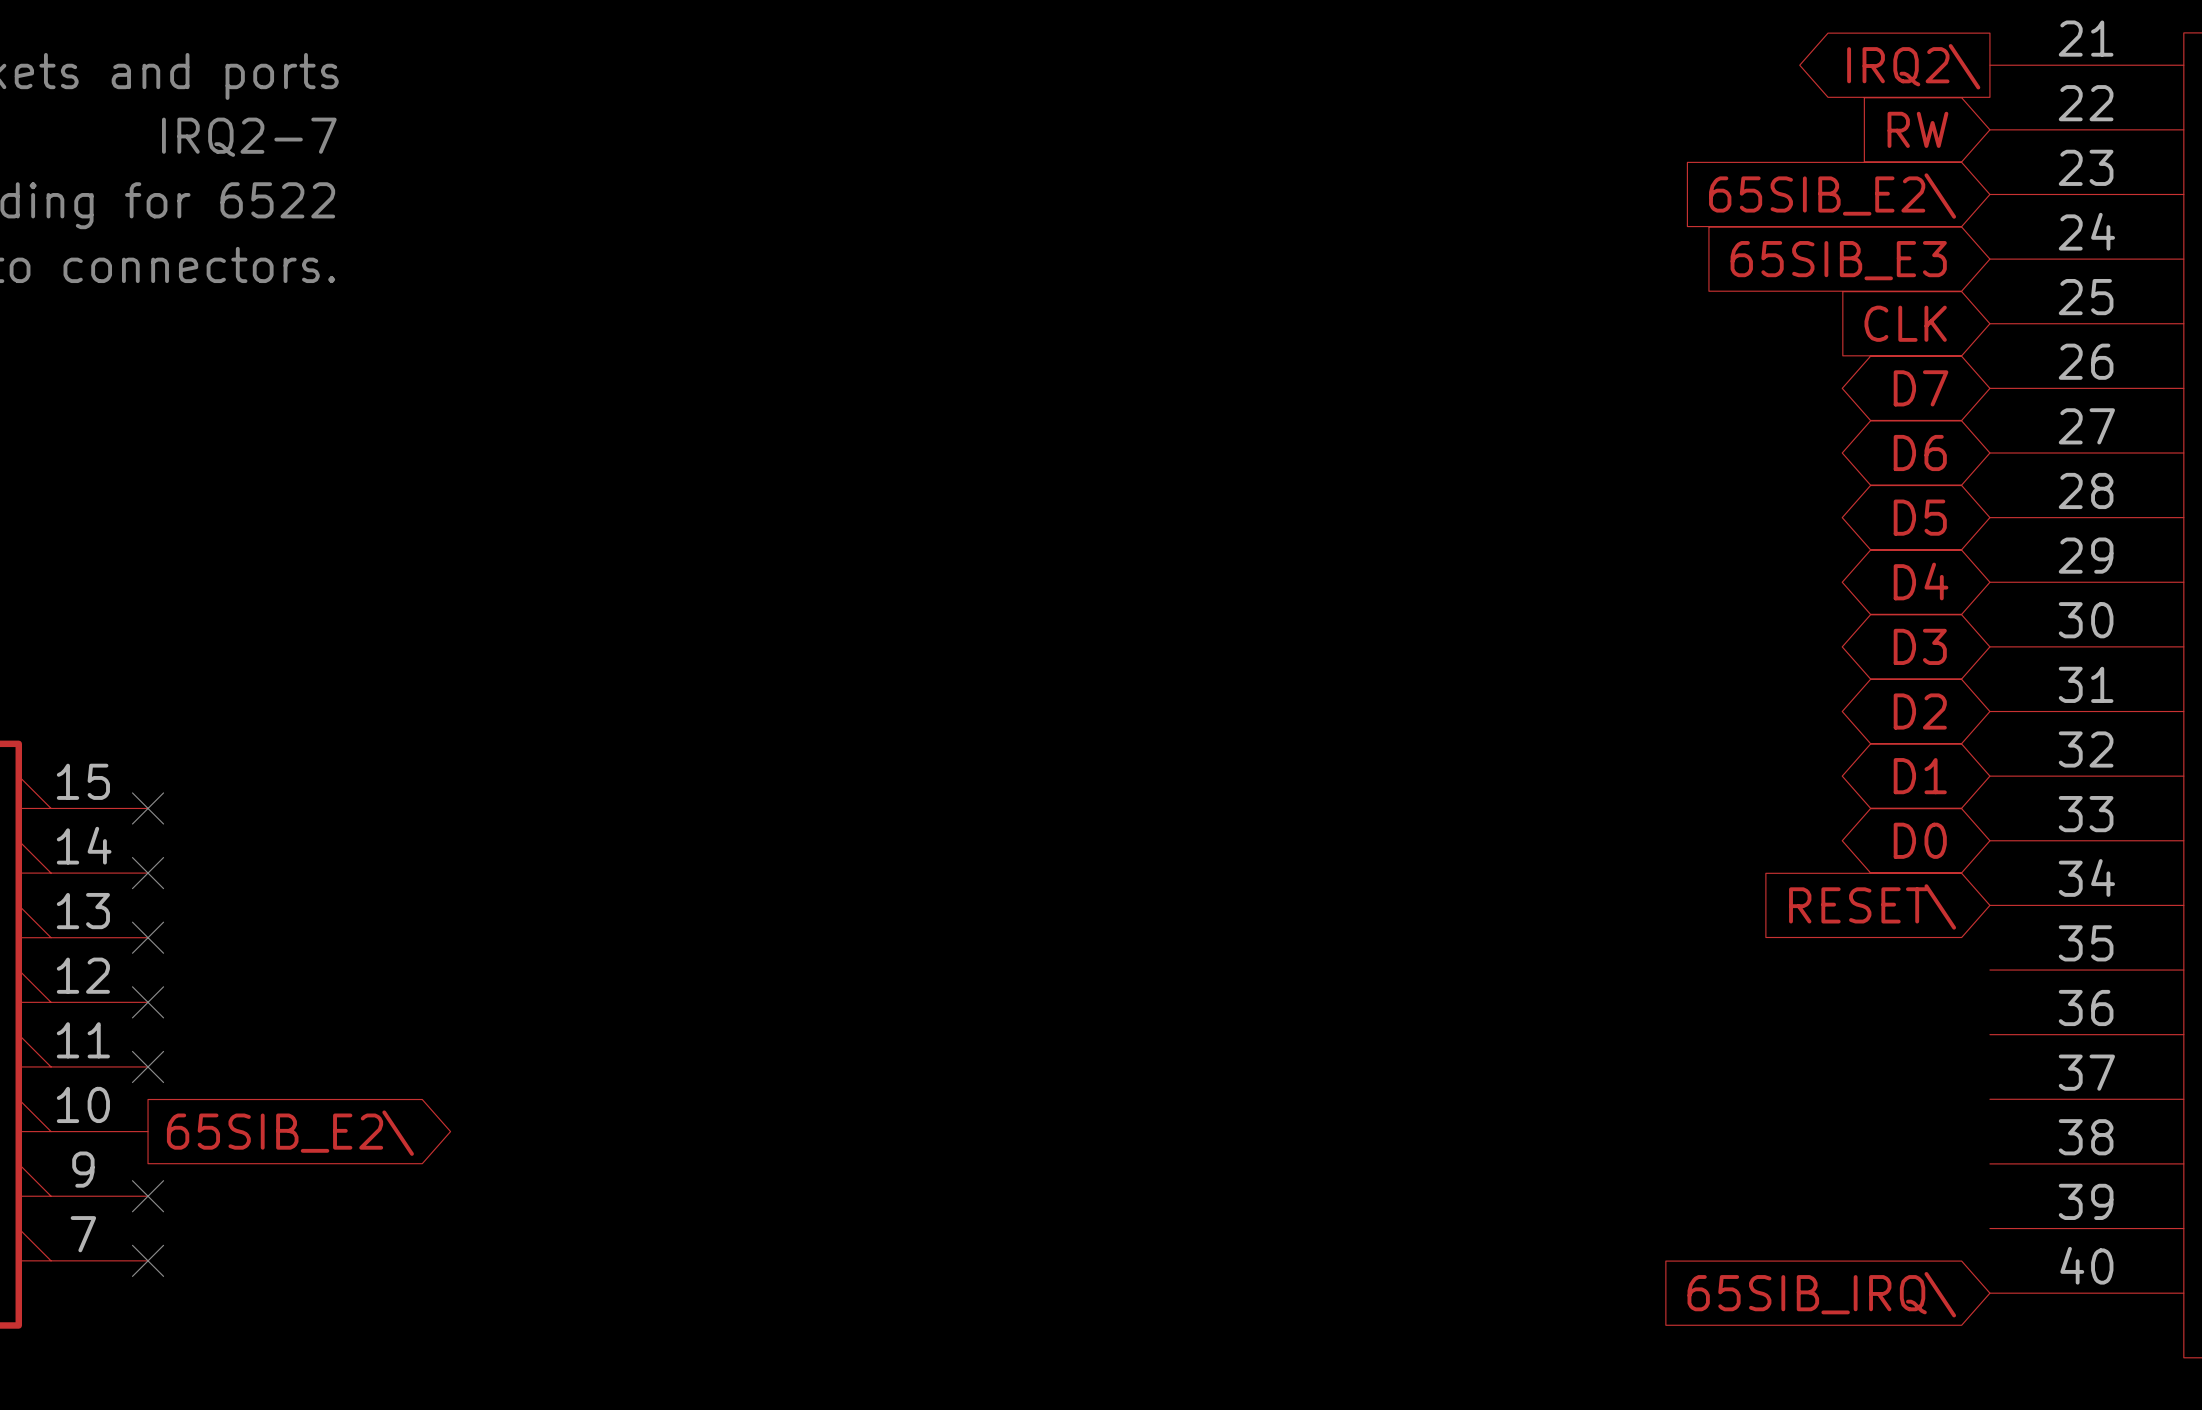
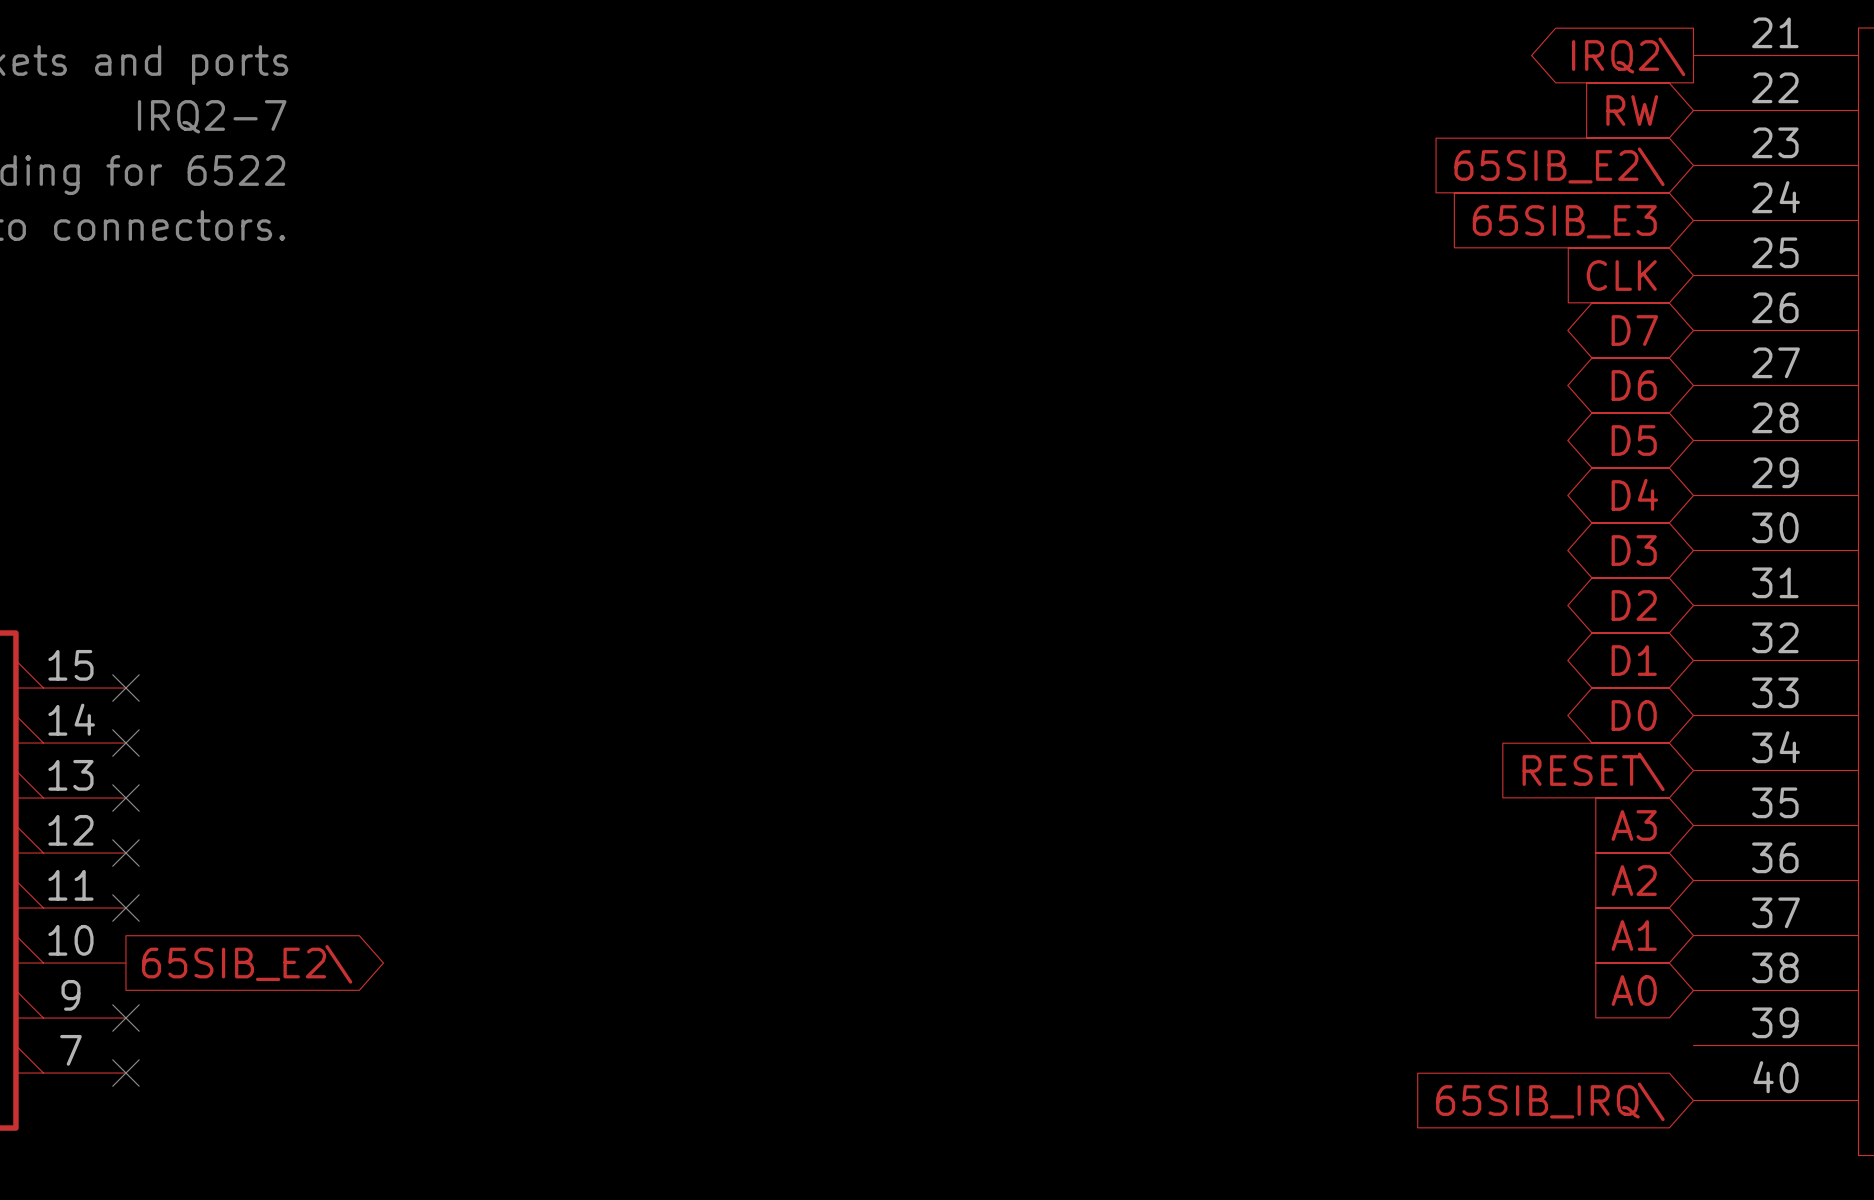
global label: none -> A3 (1634, 825)
global label: none -> A2 (1634, 880)
global label: none -> A1 (1634, 935)
global label: none -> A0 (1634, 990)

